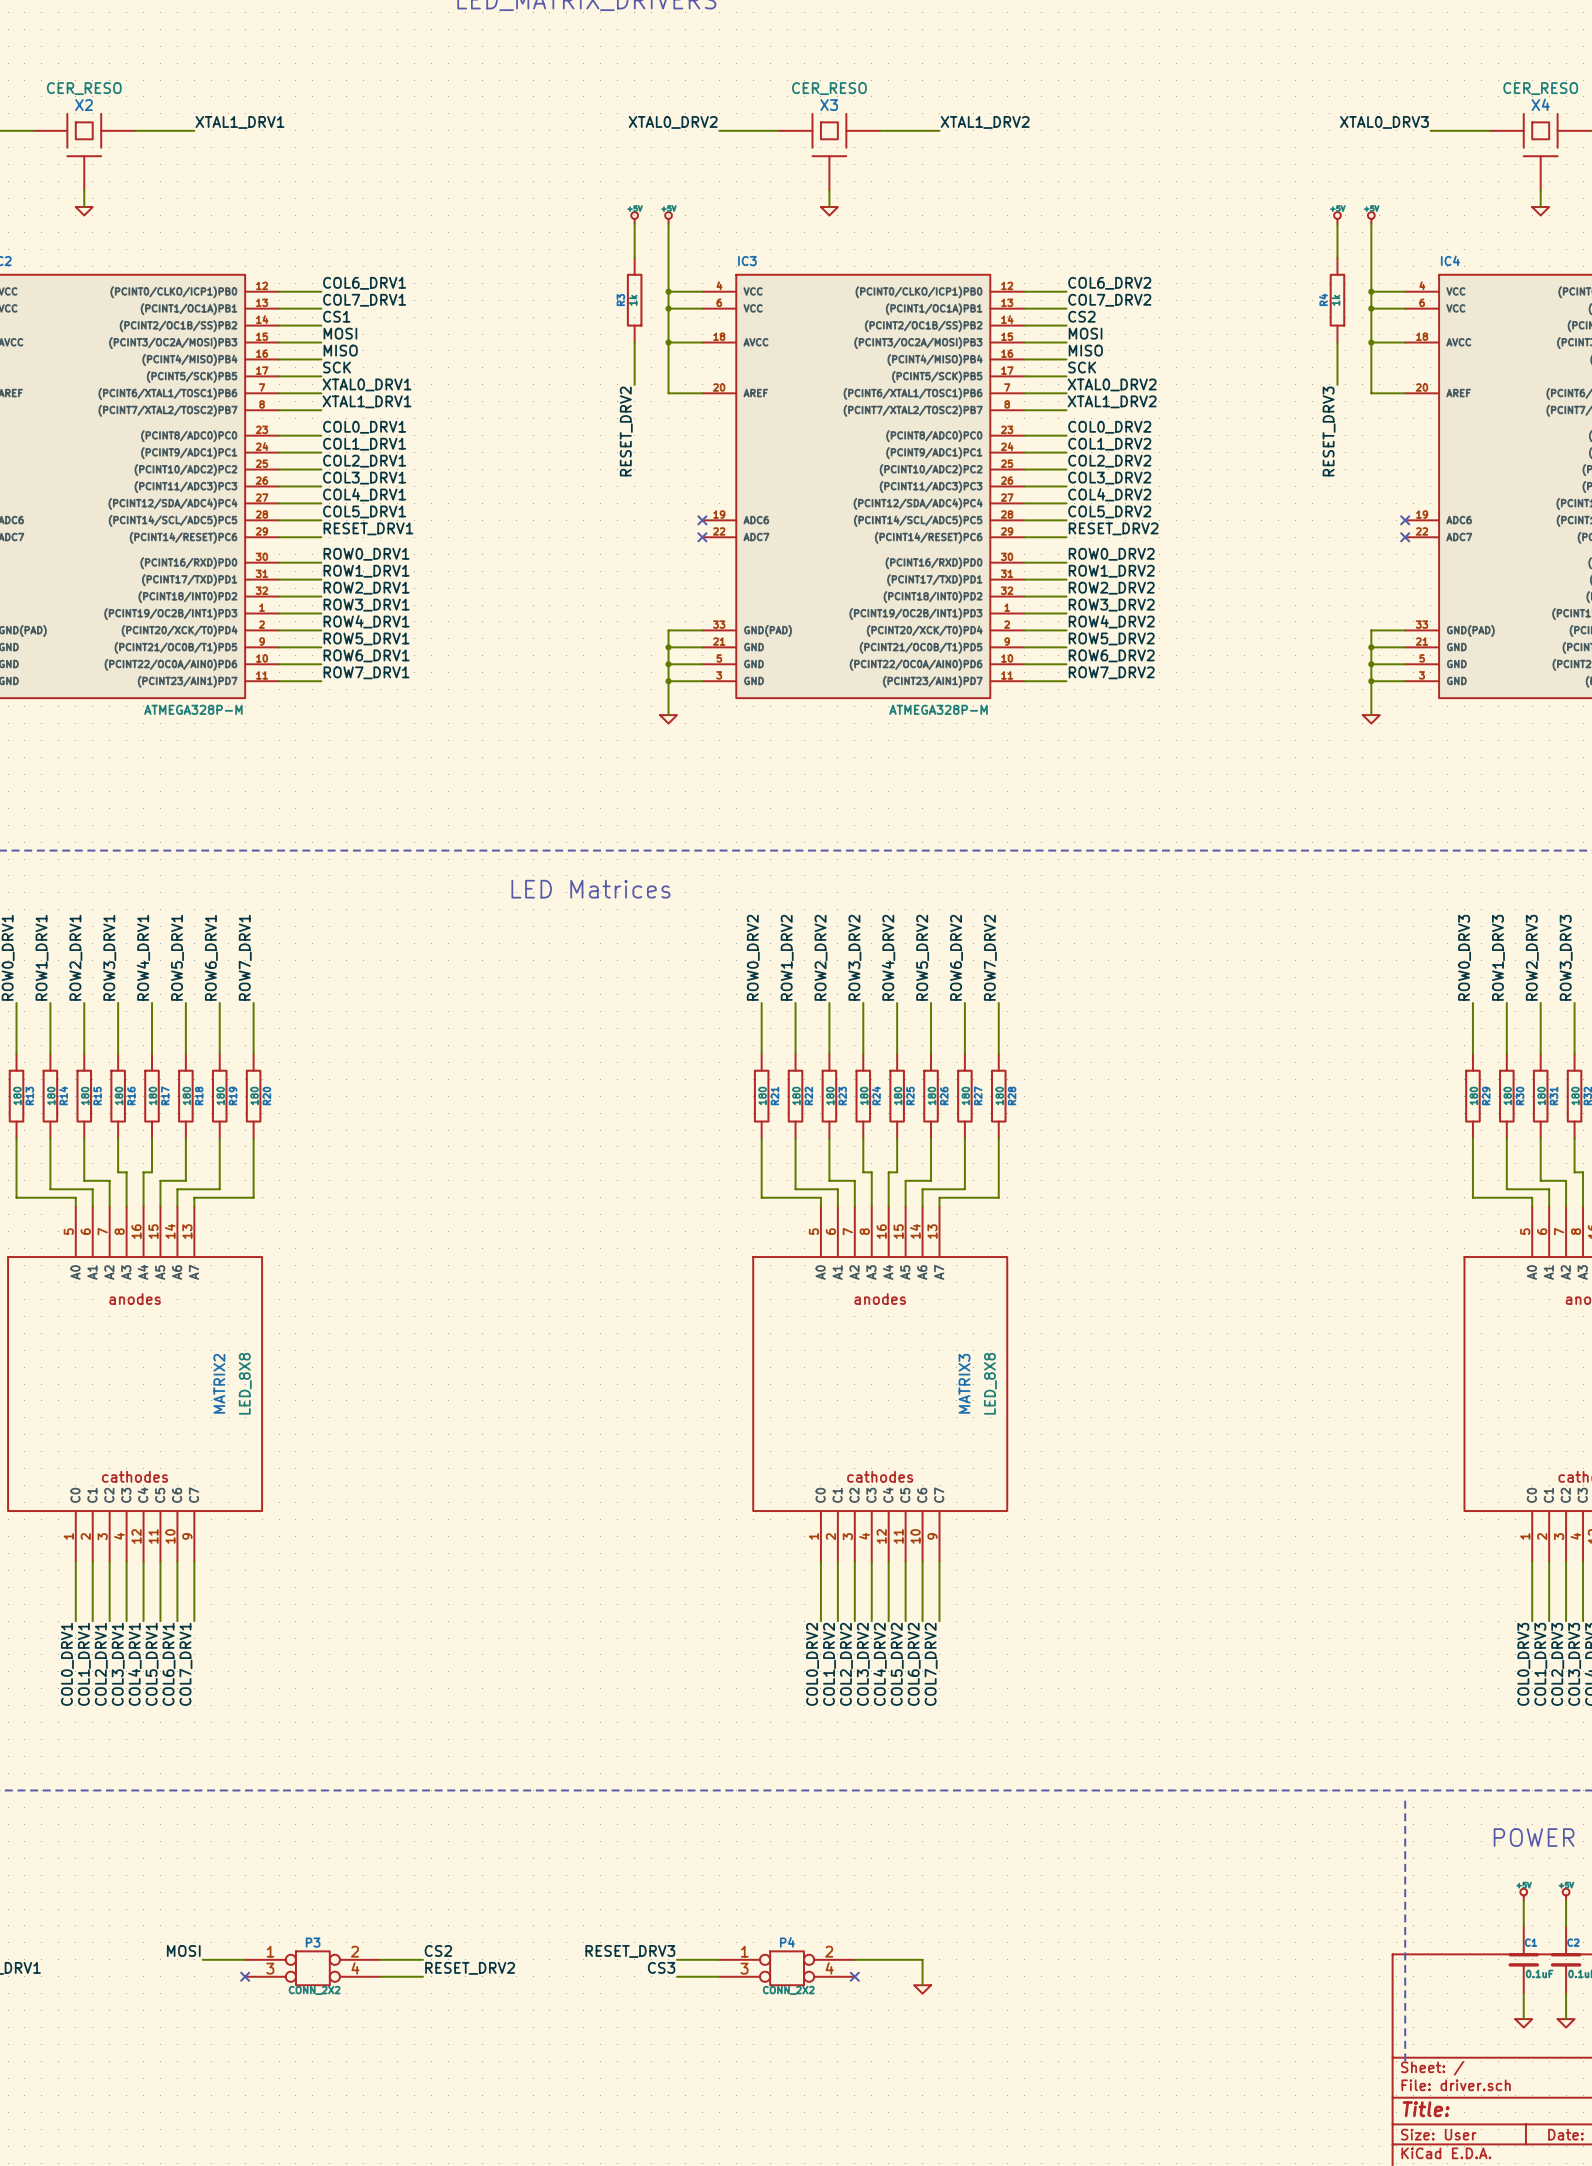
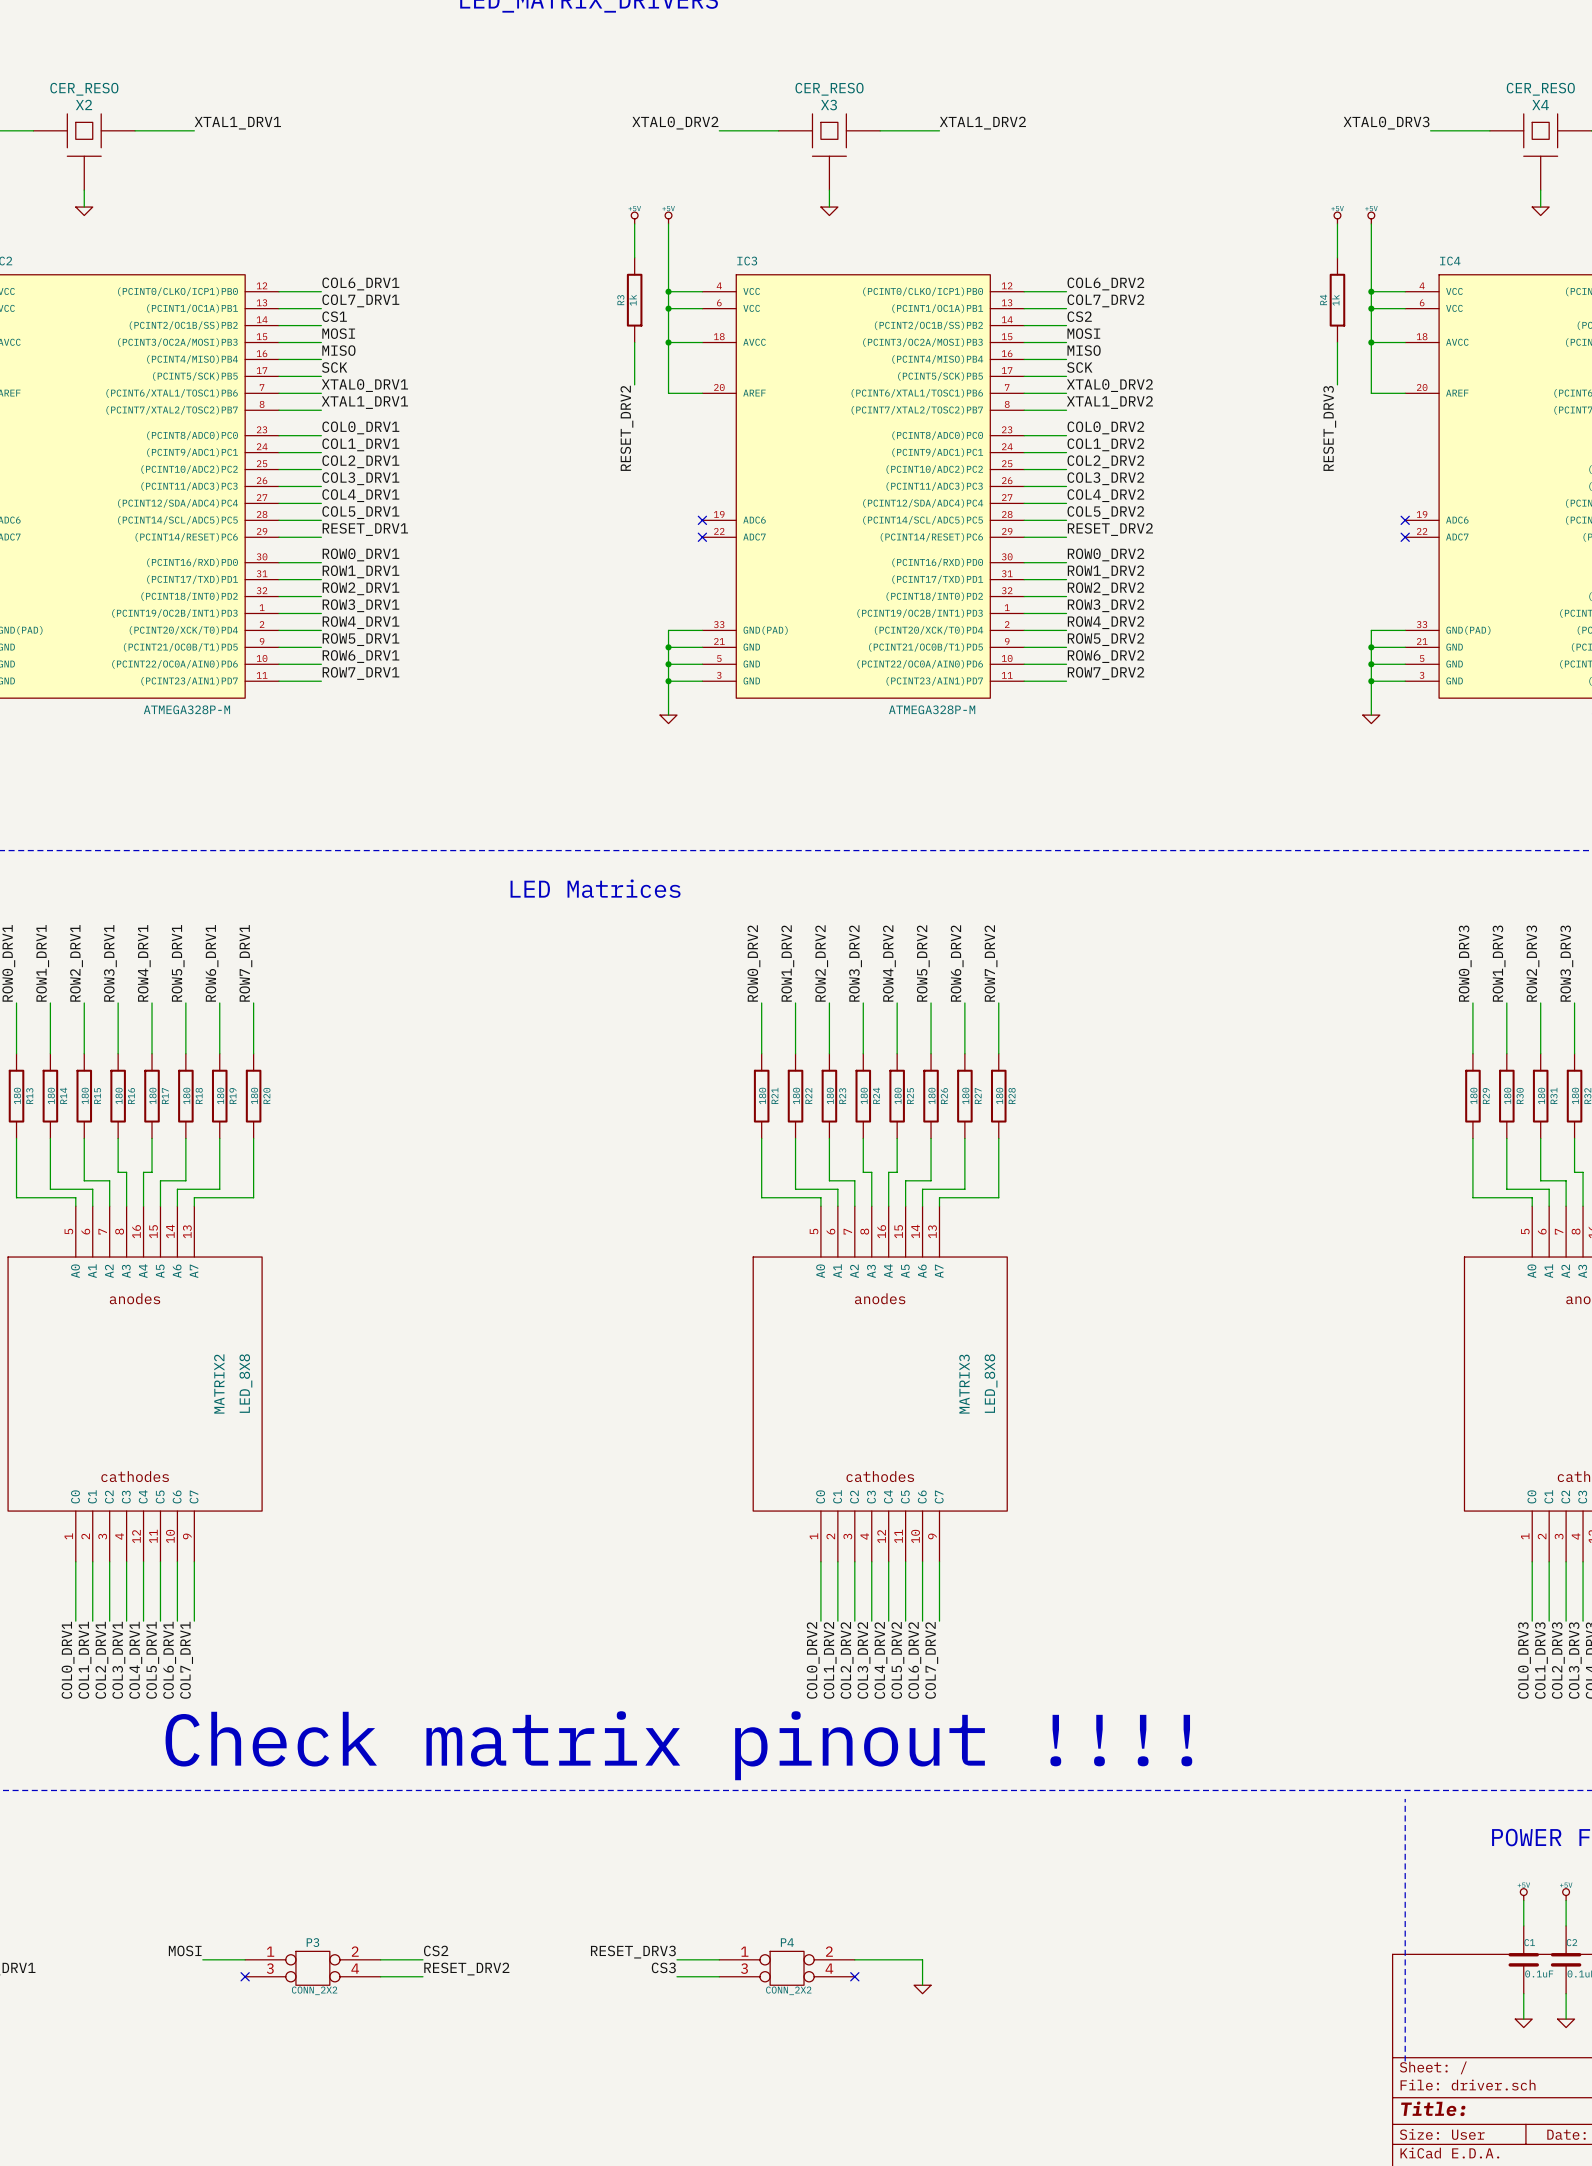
text: none -> Check matrix pinout !!!! (678, 1745)

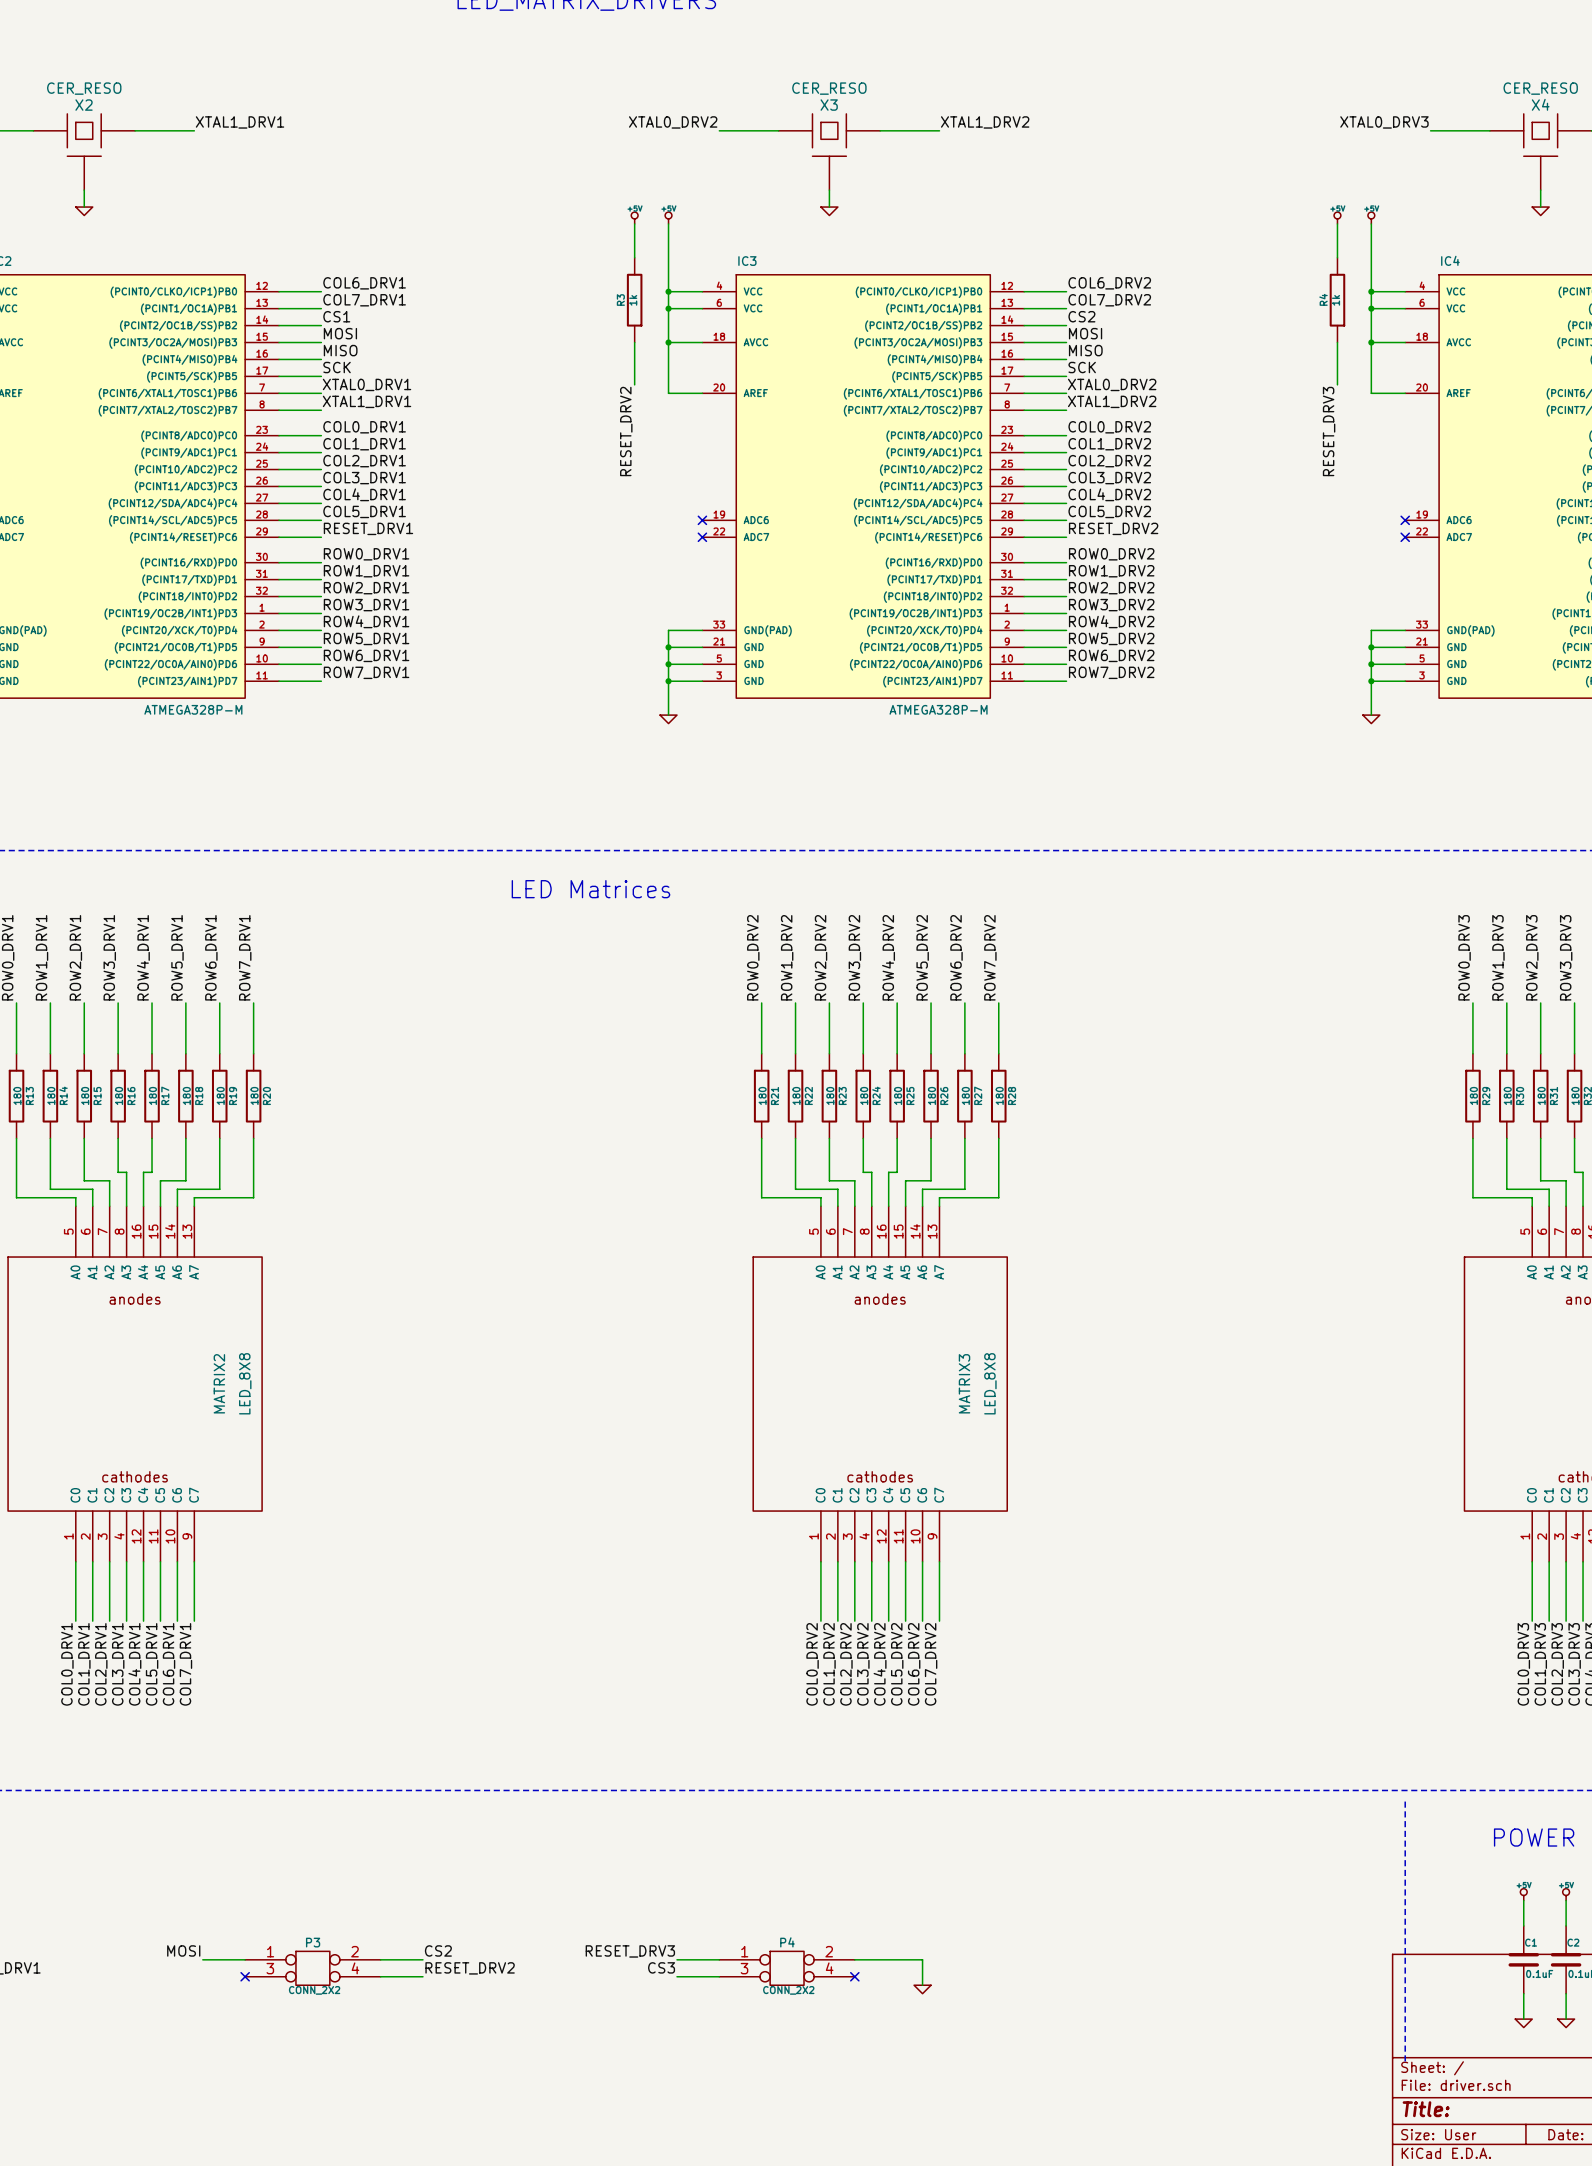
text: Check matrix pinout !!!! (678, 1745) -> none

